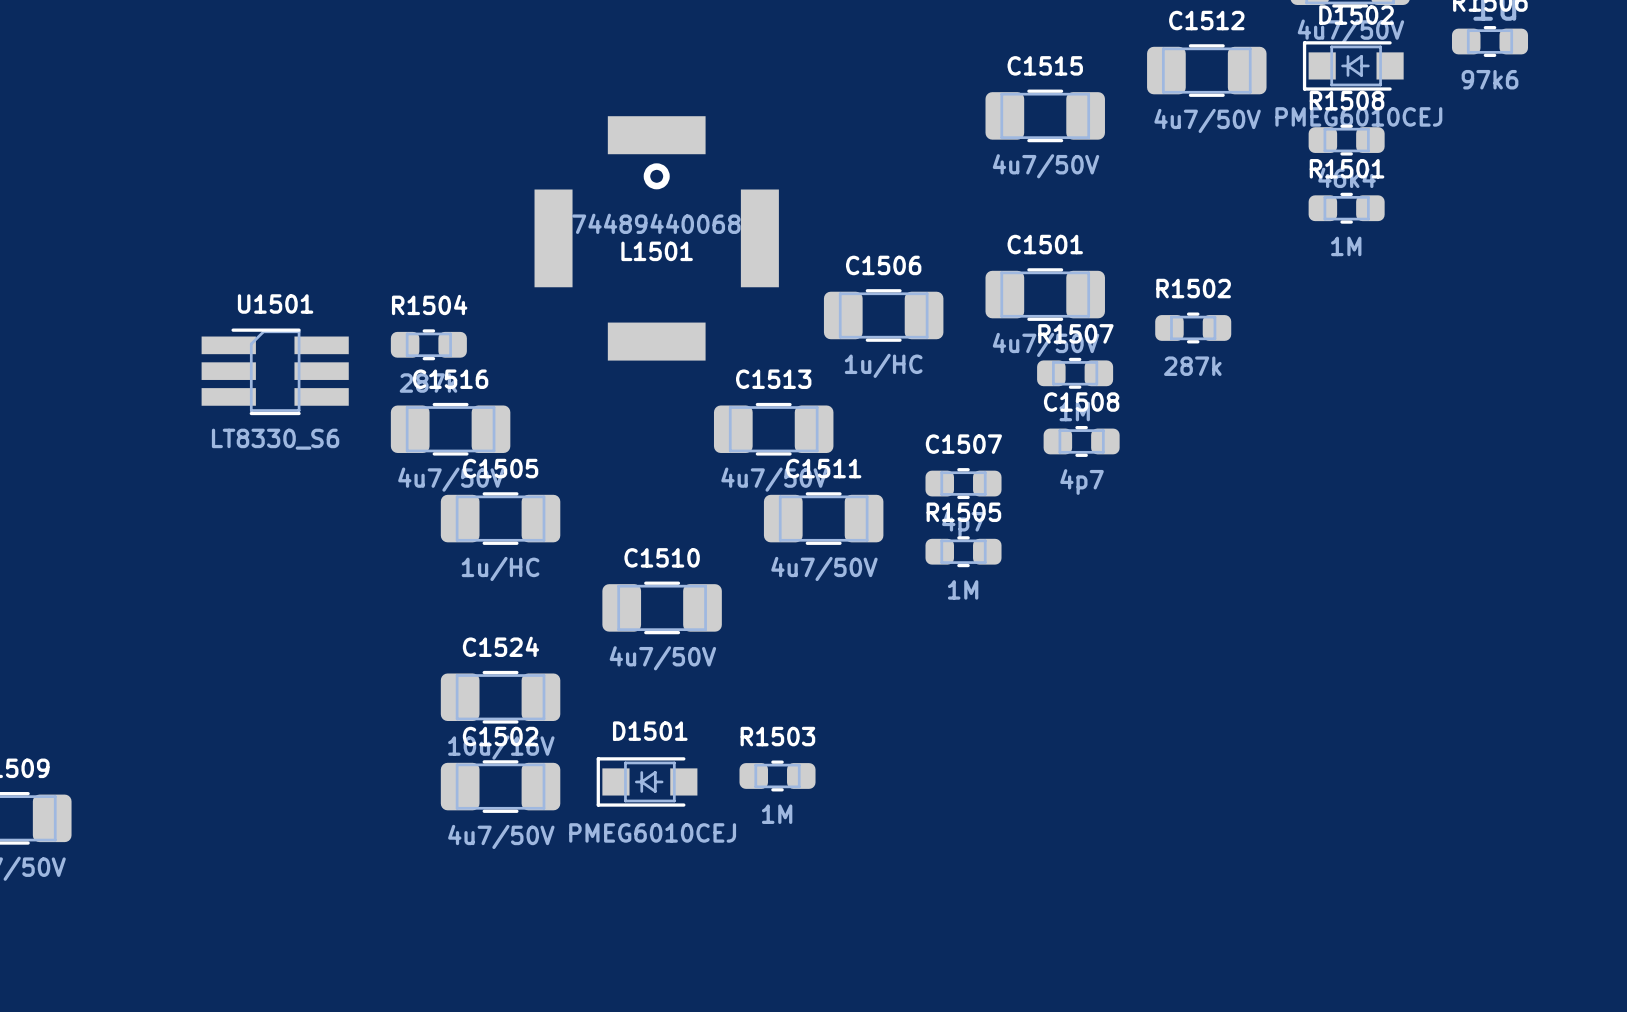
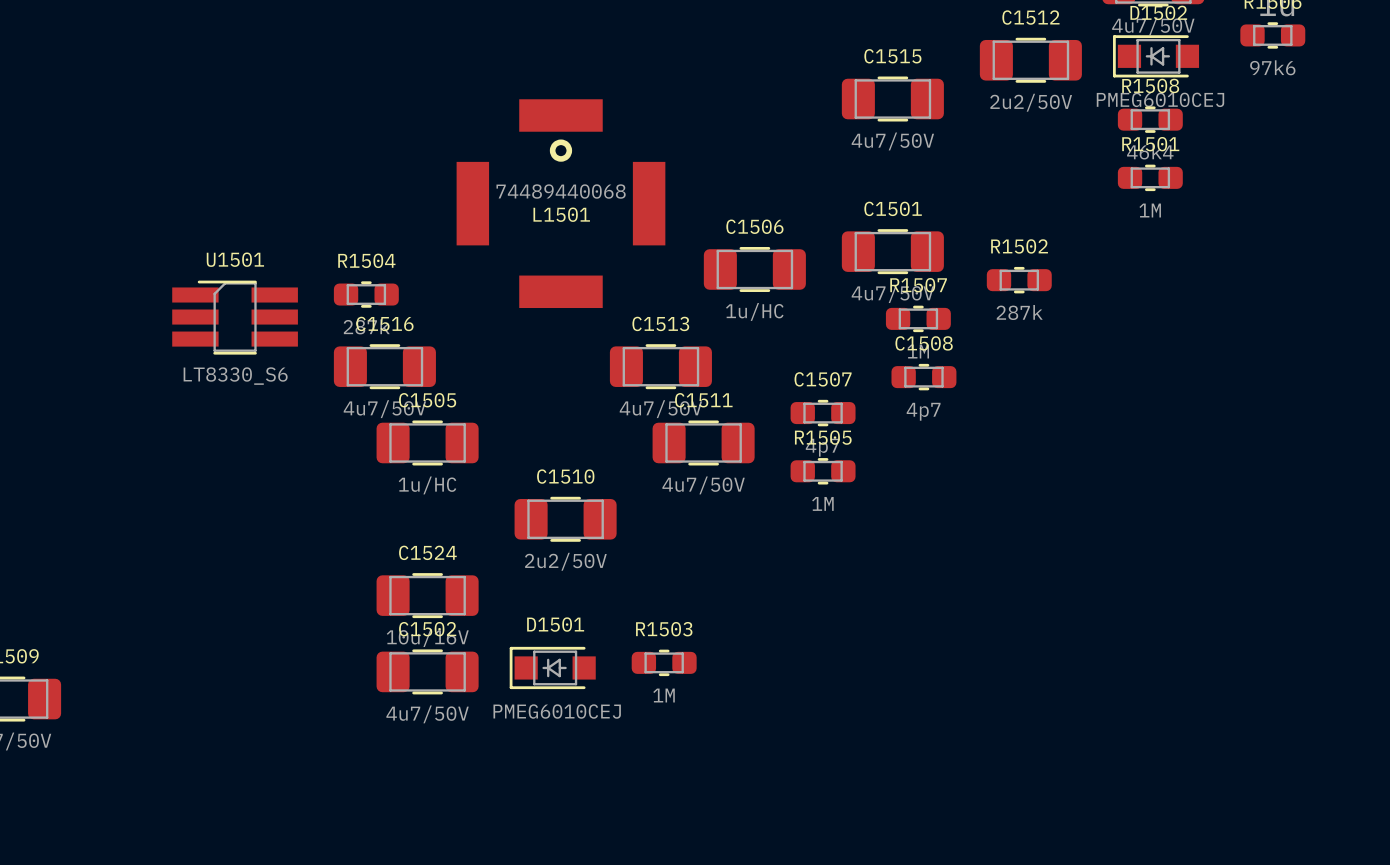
C1512 value: 4u7/50V (1207, 120) -> 2u2/50V (1031, 102)
C1510 value: 4u7/50V (662, 658) -> 2u2/50V (565, 561)

